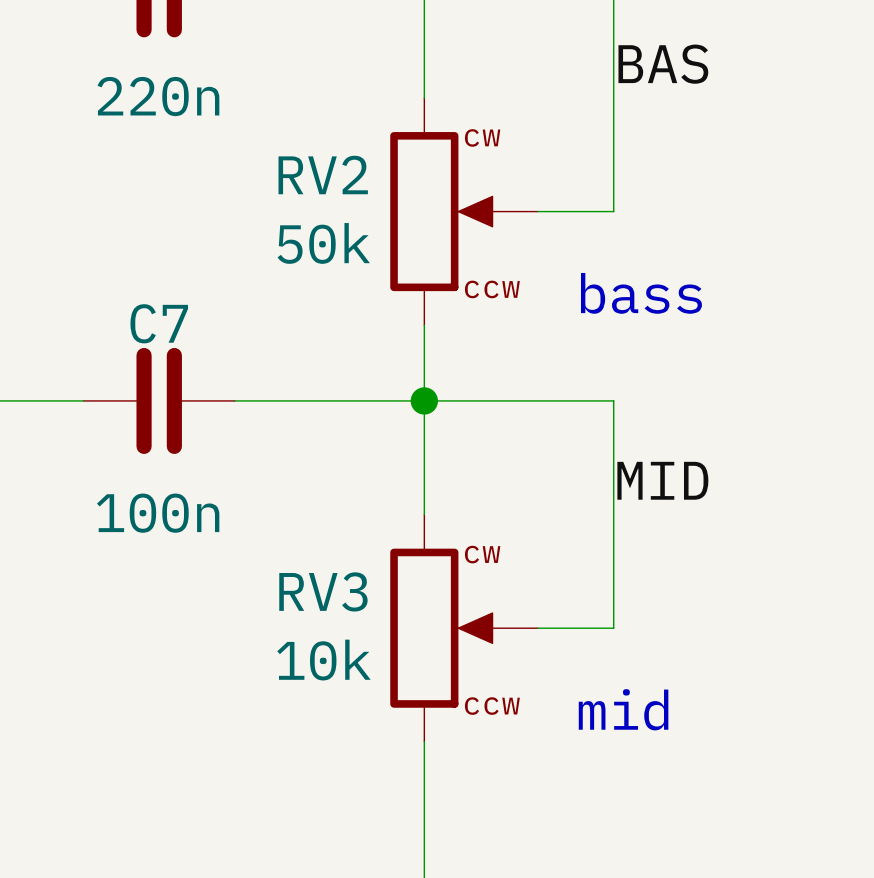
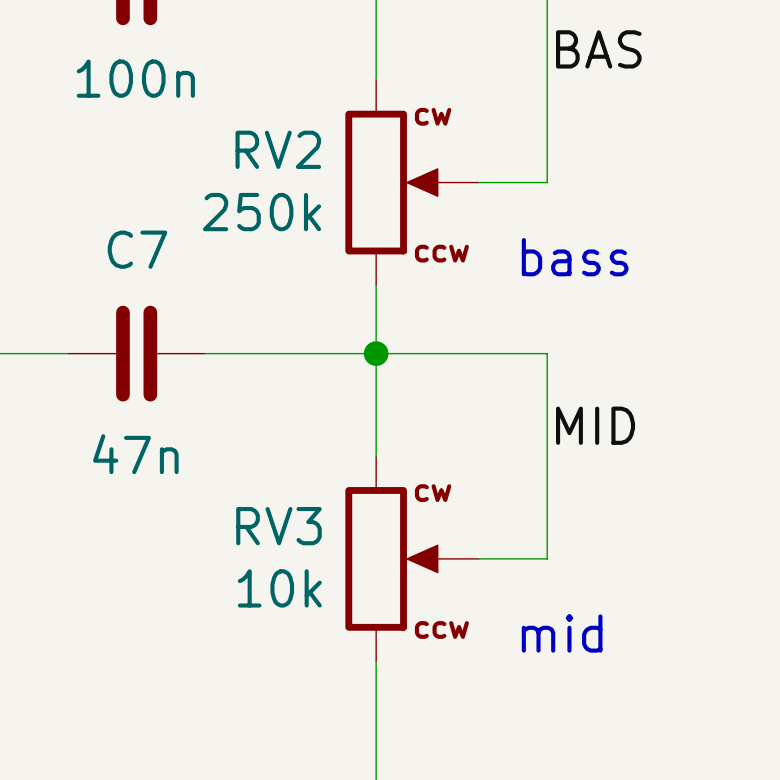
part value: 220n (158, 96) -> 100n (135, 78)
RV2 value: 50k (323, 243) -> 250k (262, 212)
C7 name position: C7 (159, 323) -> C7 (137, 249)
C7 value: 100n (158, 513) -> 47n (135, 454)

